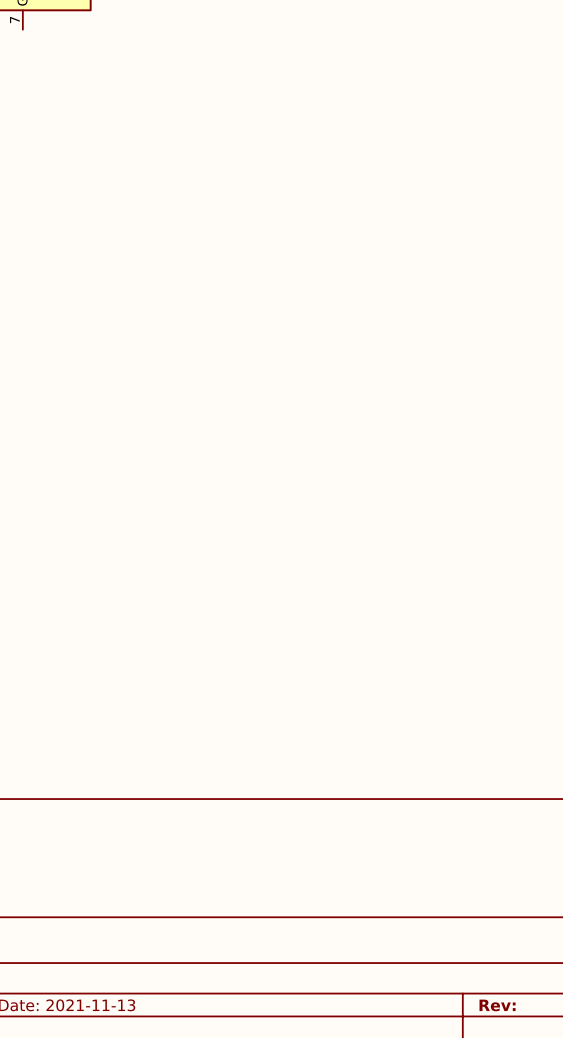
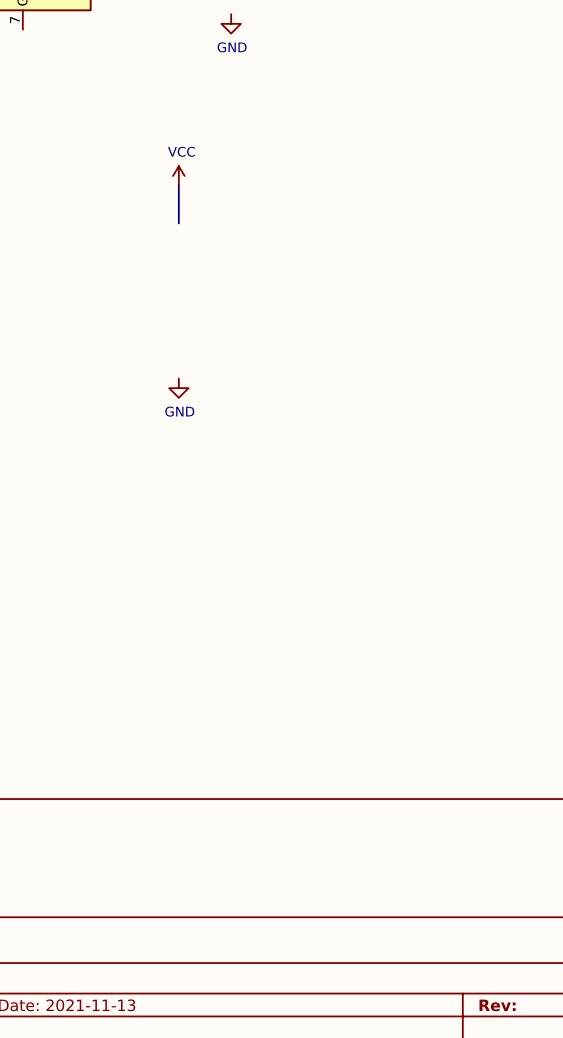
power symbol: none -> GND (231, 23)
power symbol: none -> VCC (178, 175)
wire: none -> (178, 185) (178, 223)
power symbol: none -> GND (178, 388)

